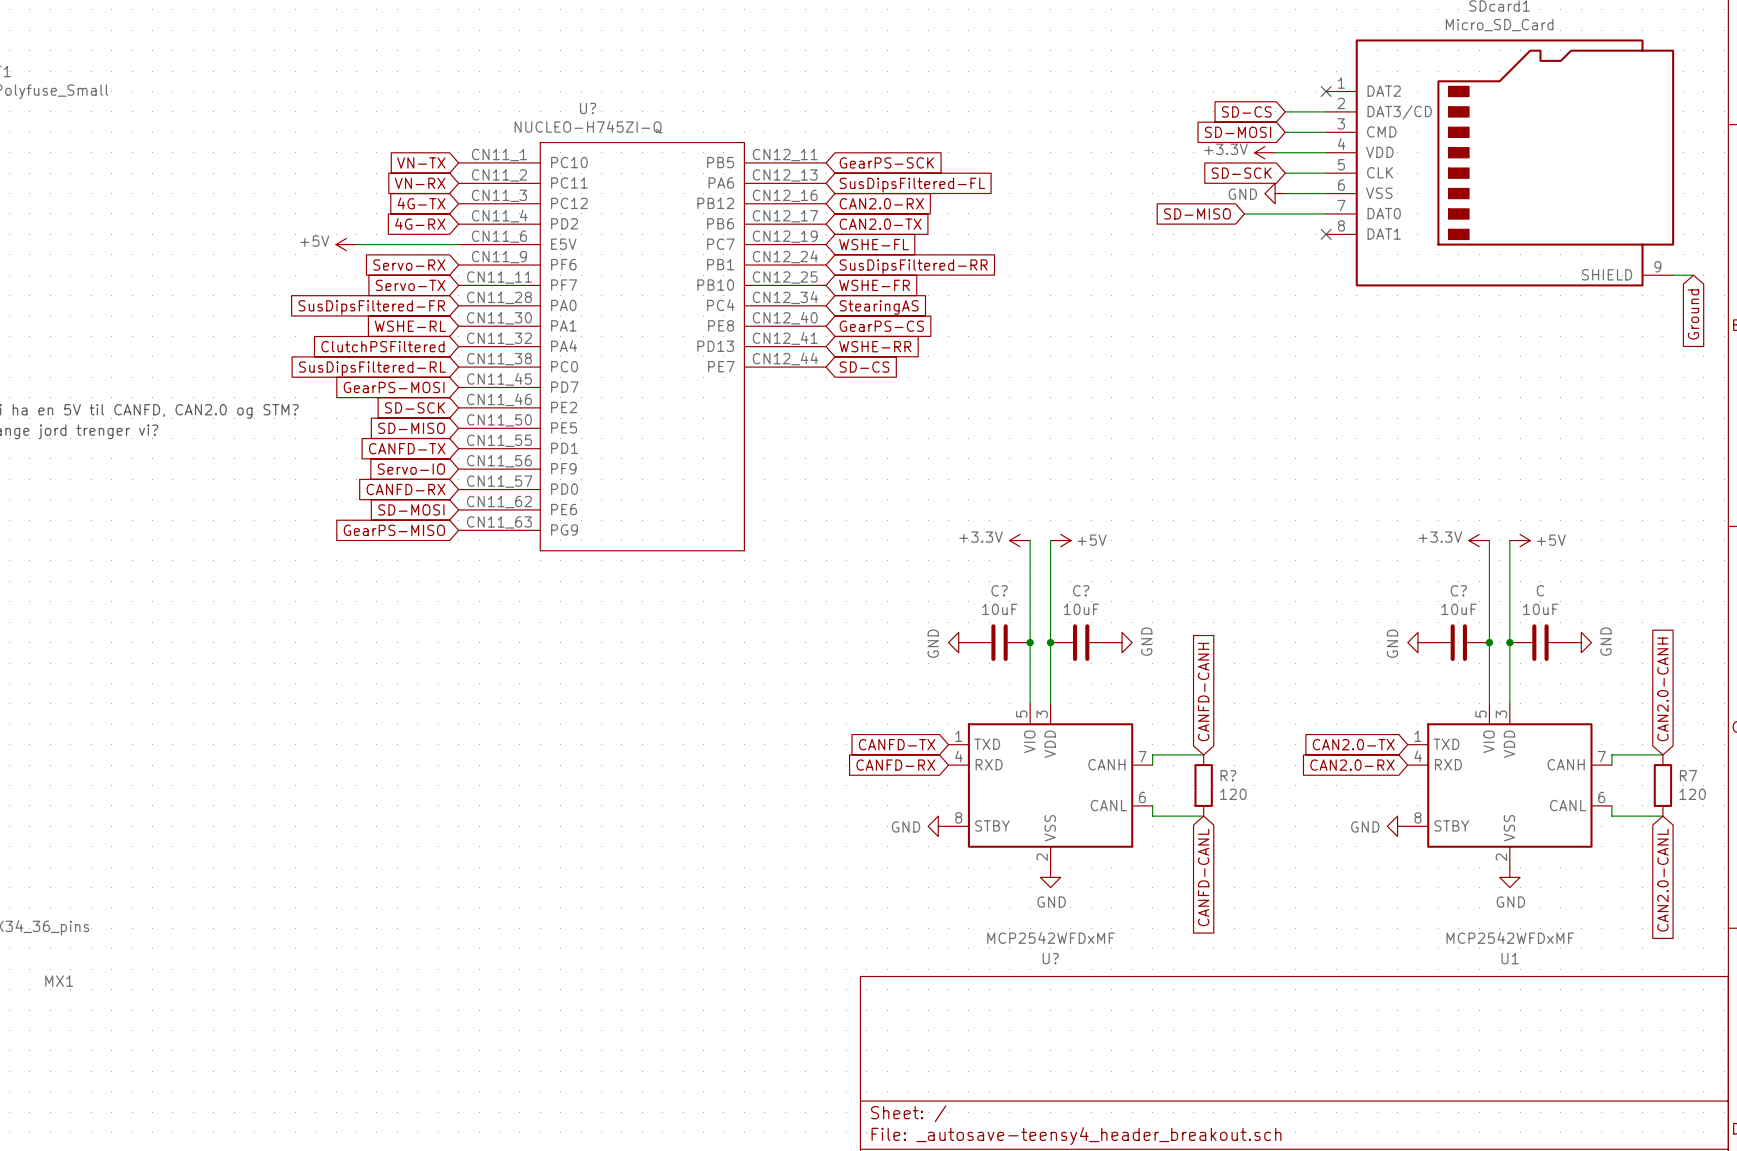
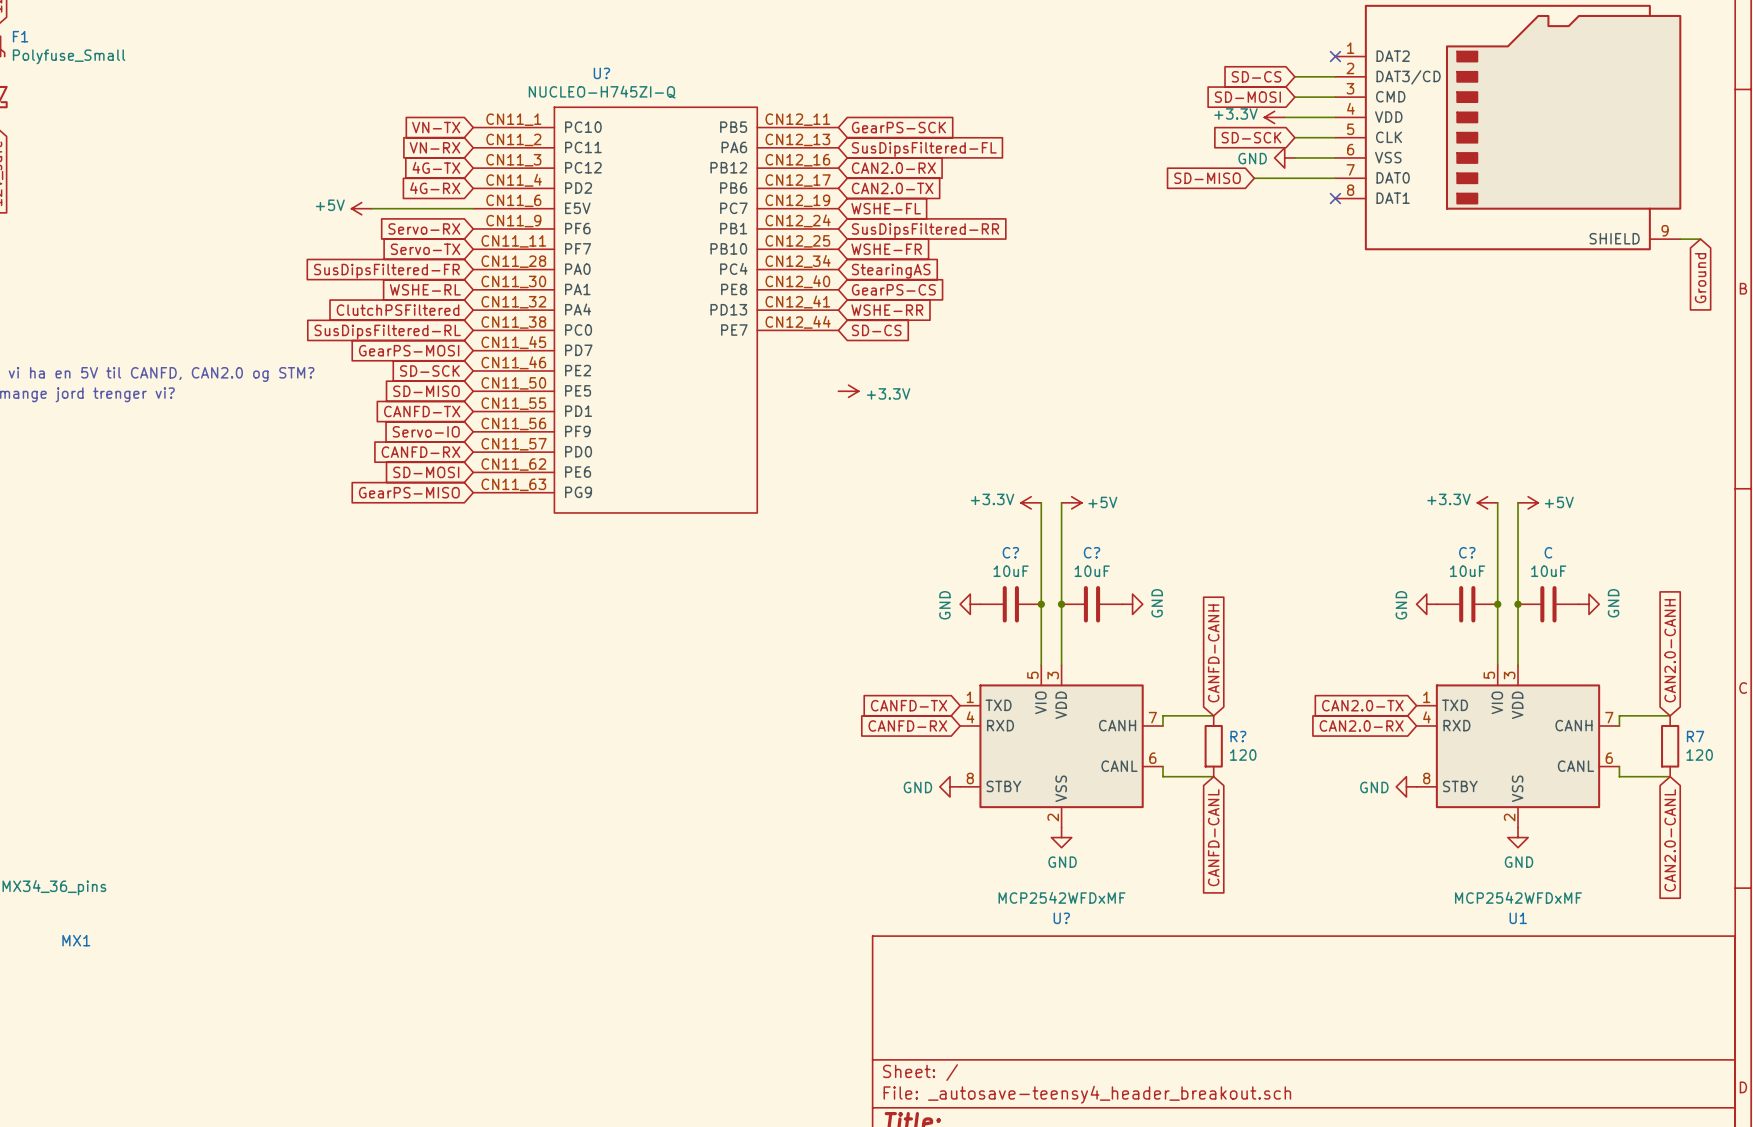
power symbol: none -> +3.3V (848, 391)

